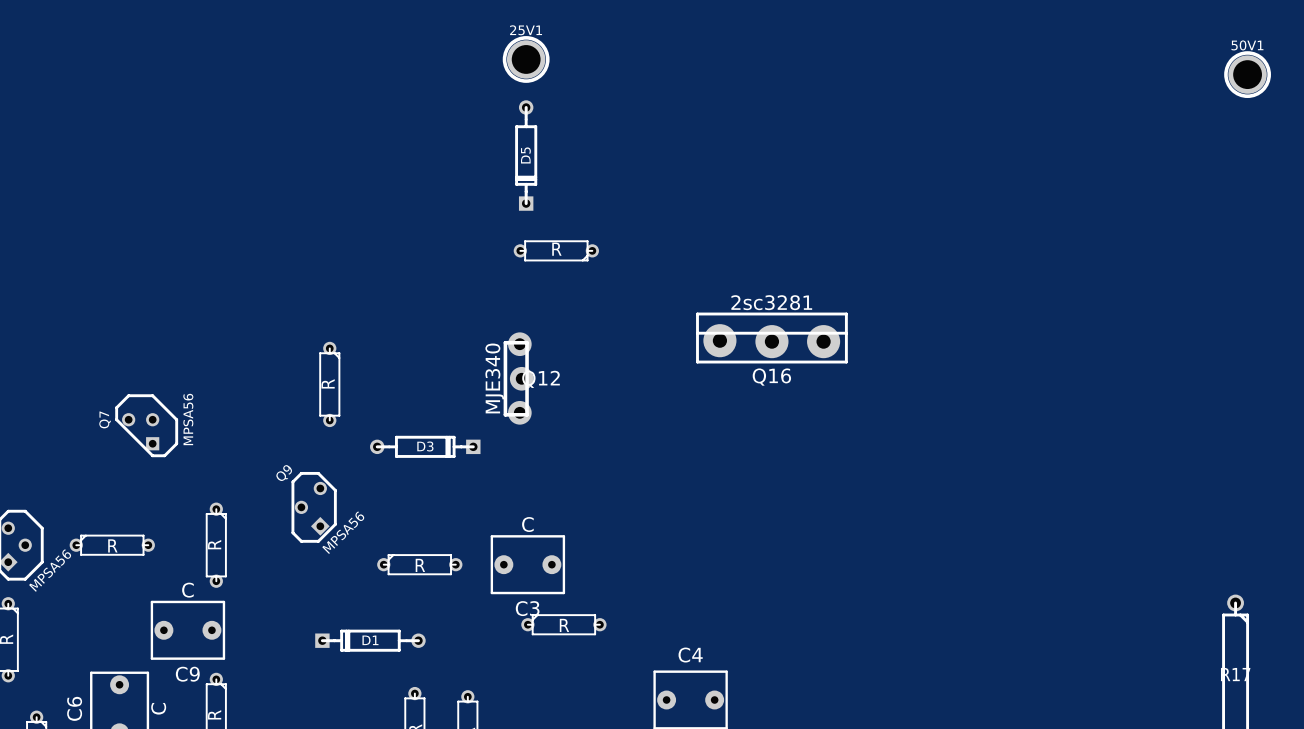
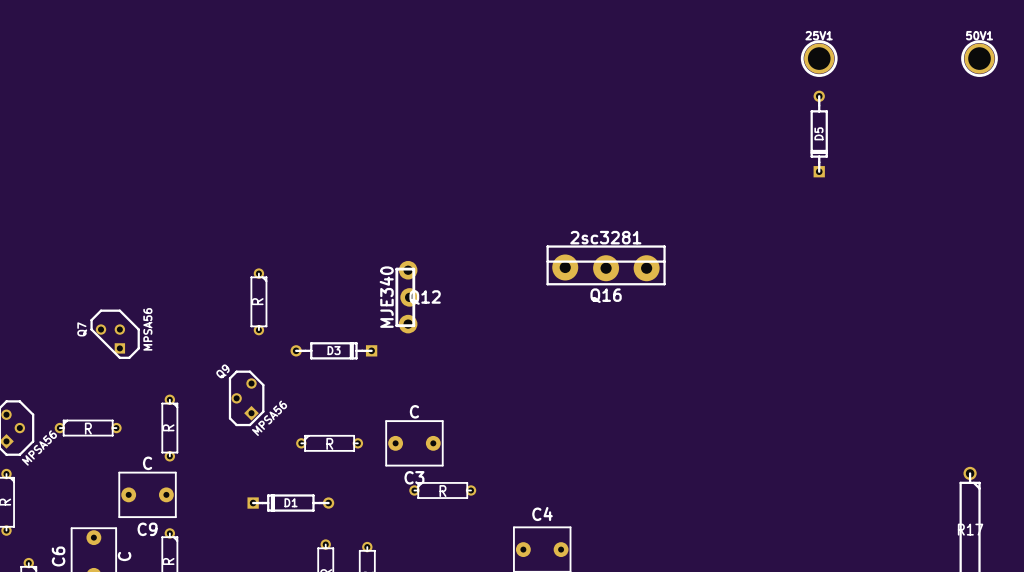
25V1 position: (526, 59) -> (819, 58)
D5 position: (526, 155) -> (819, 133)
part: R (556, 250) -> none

